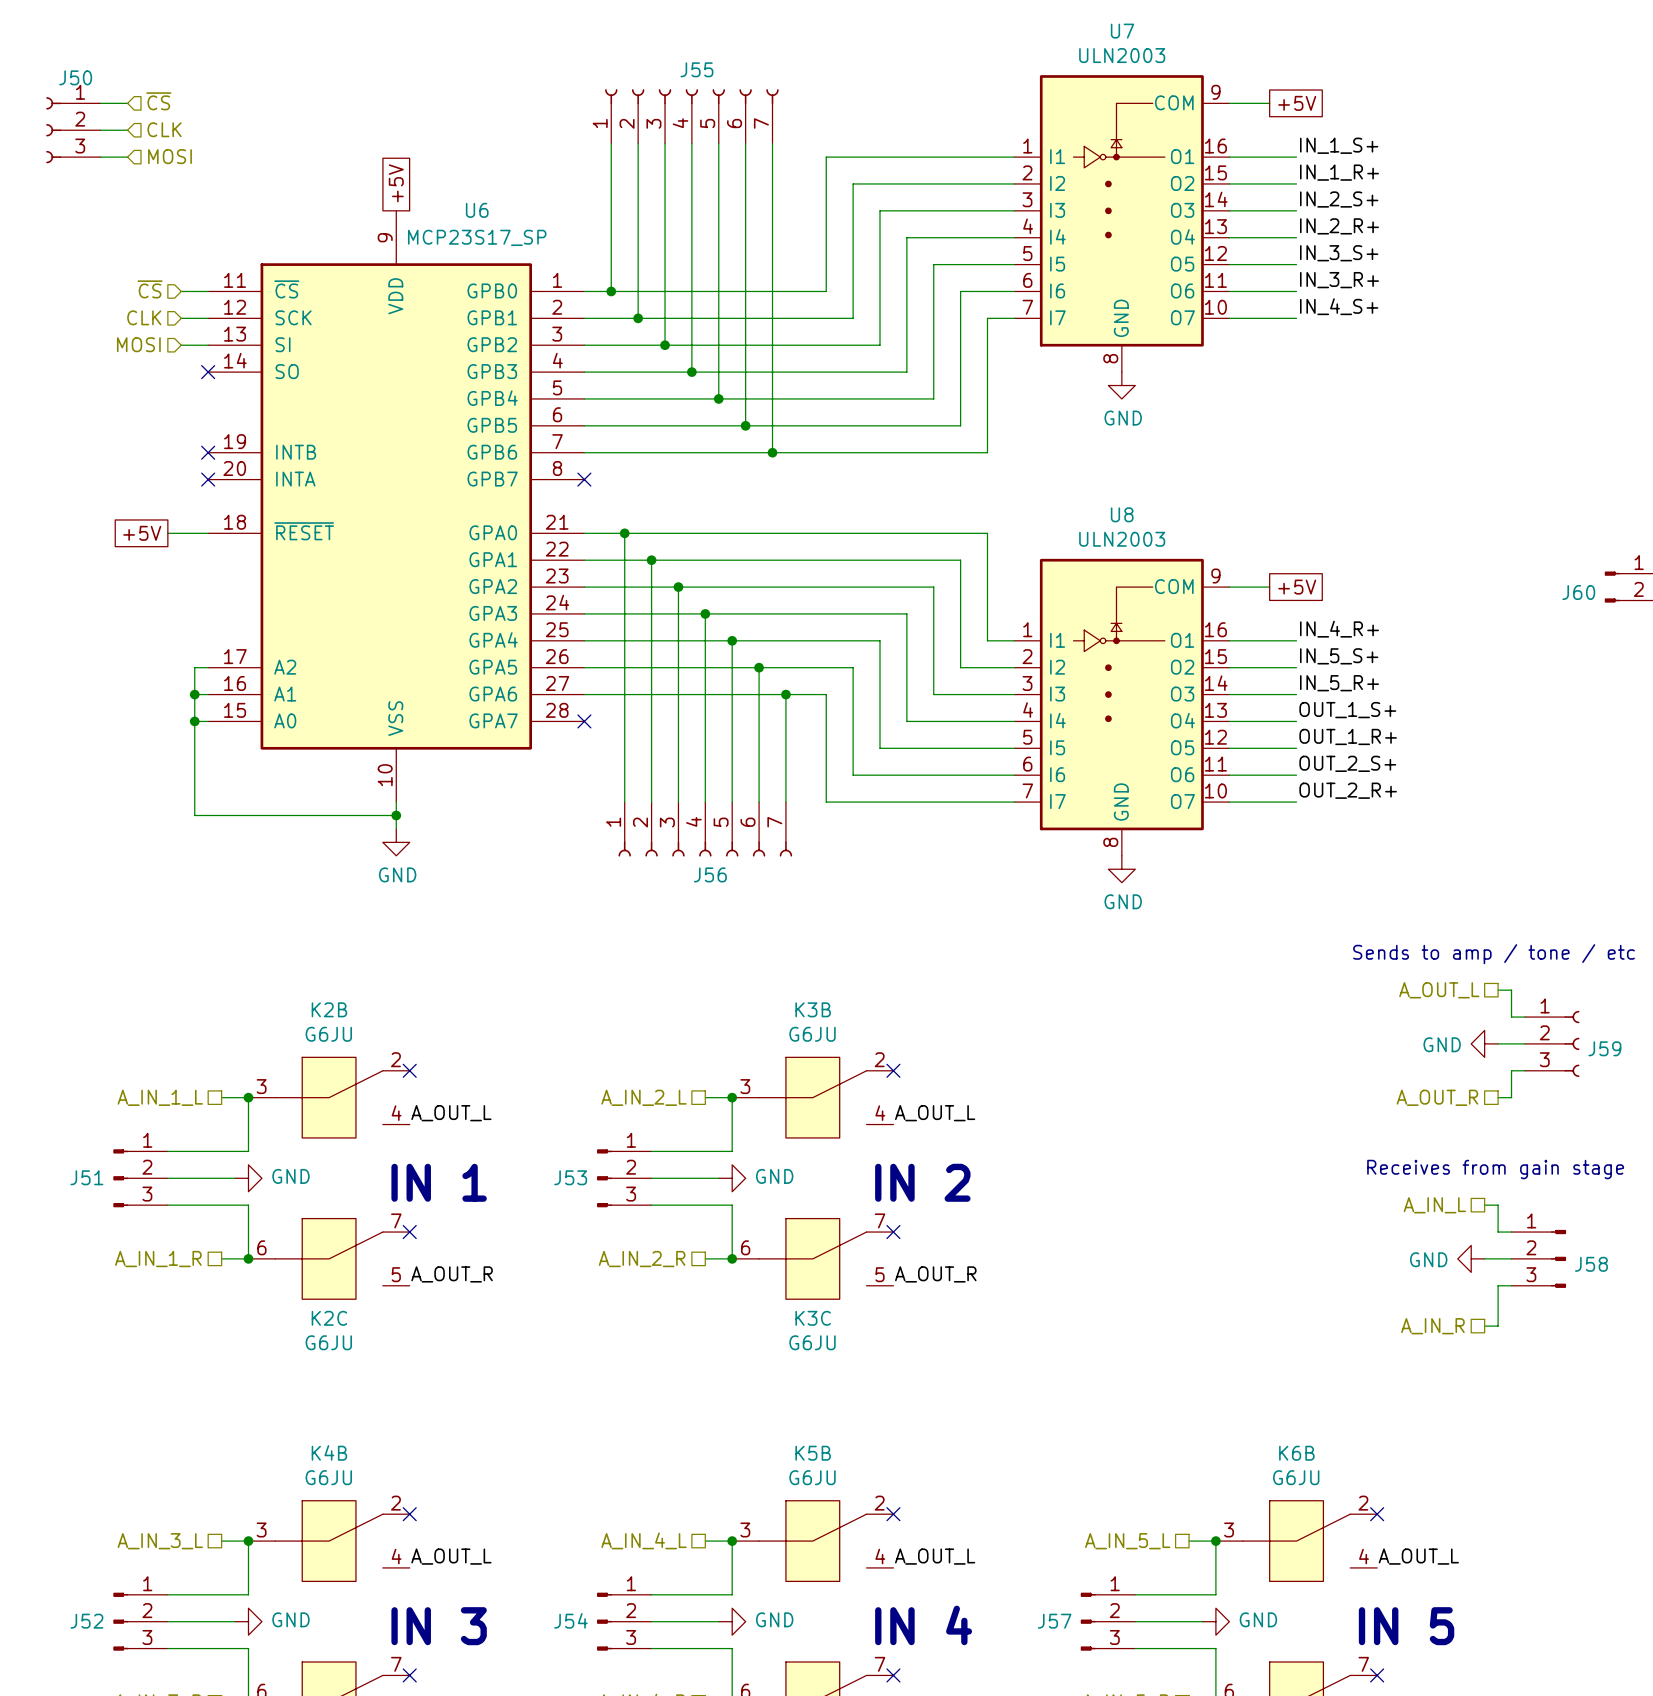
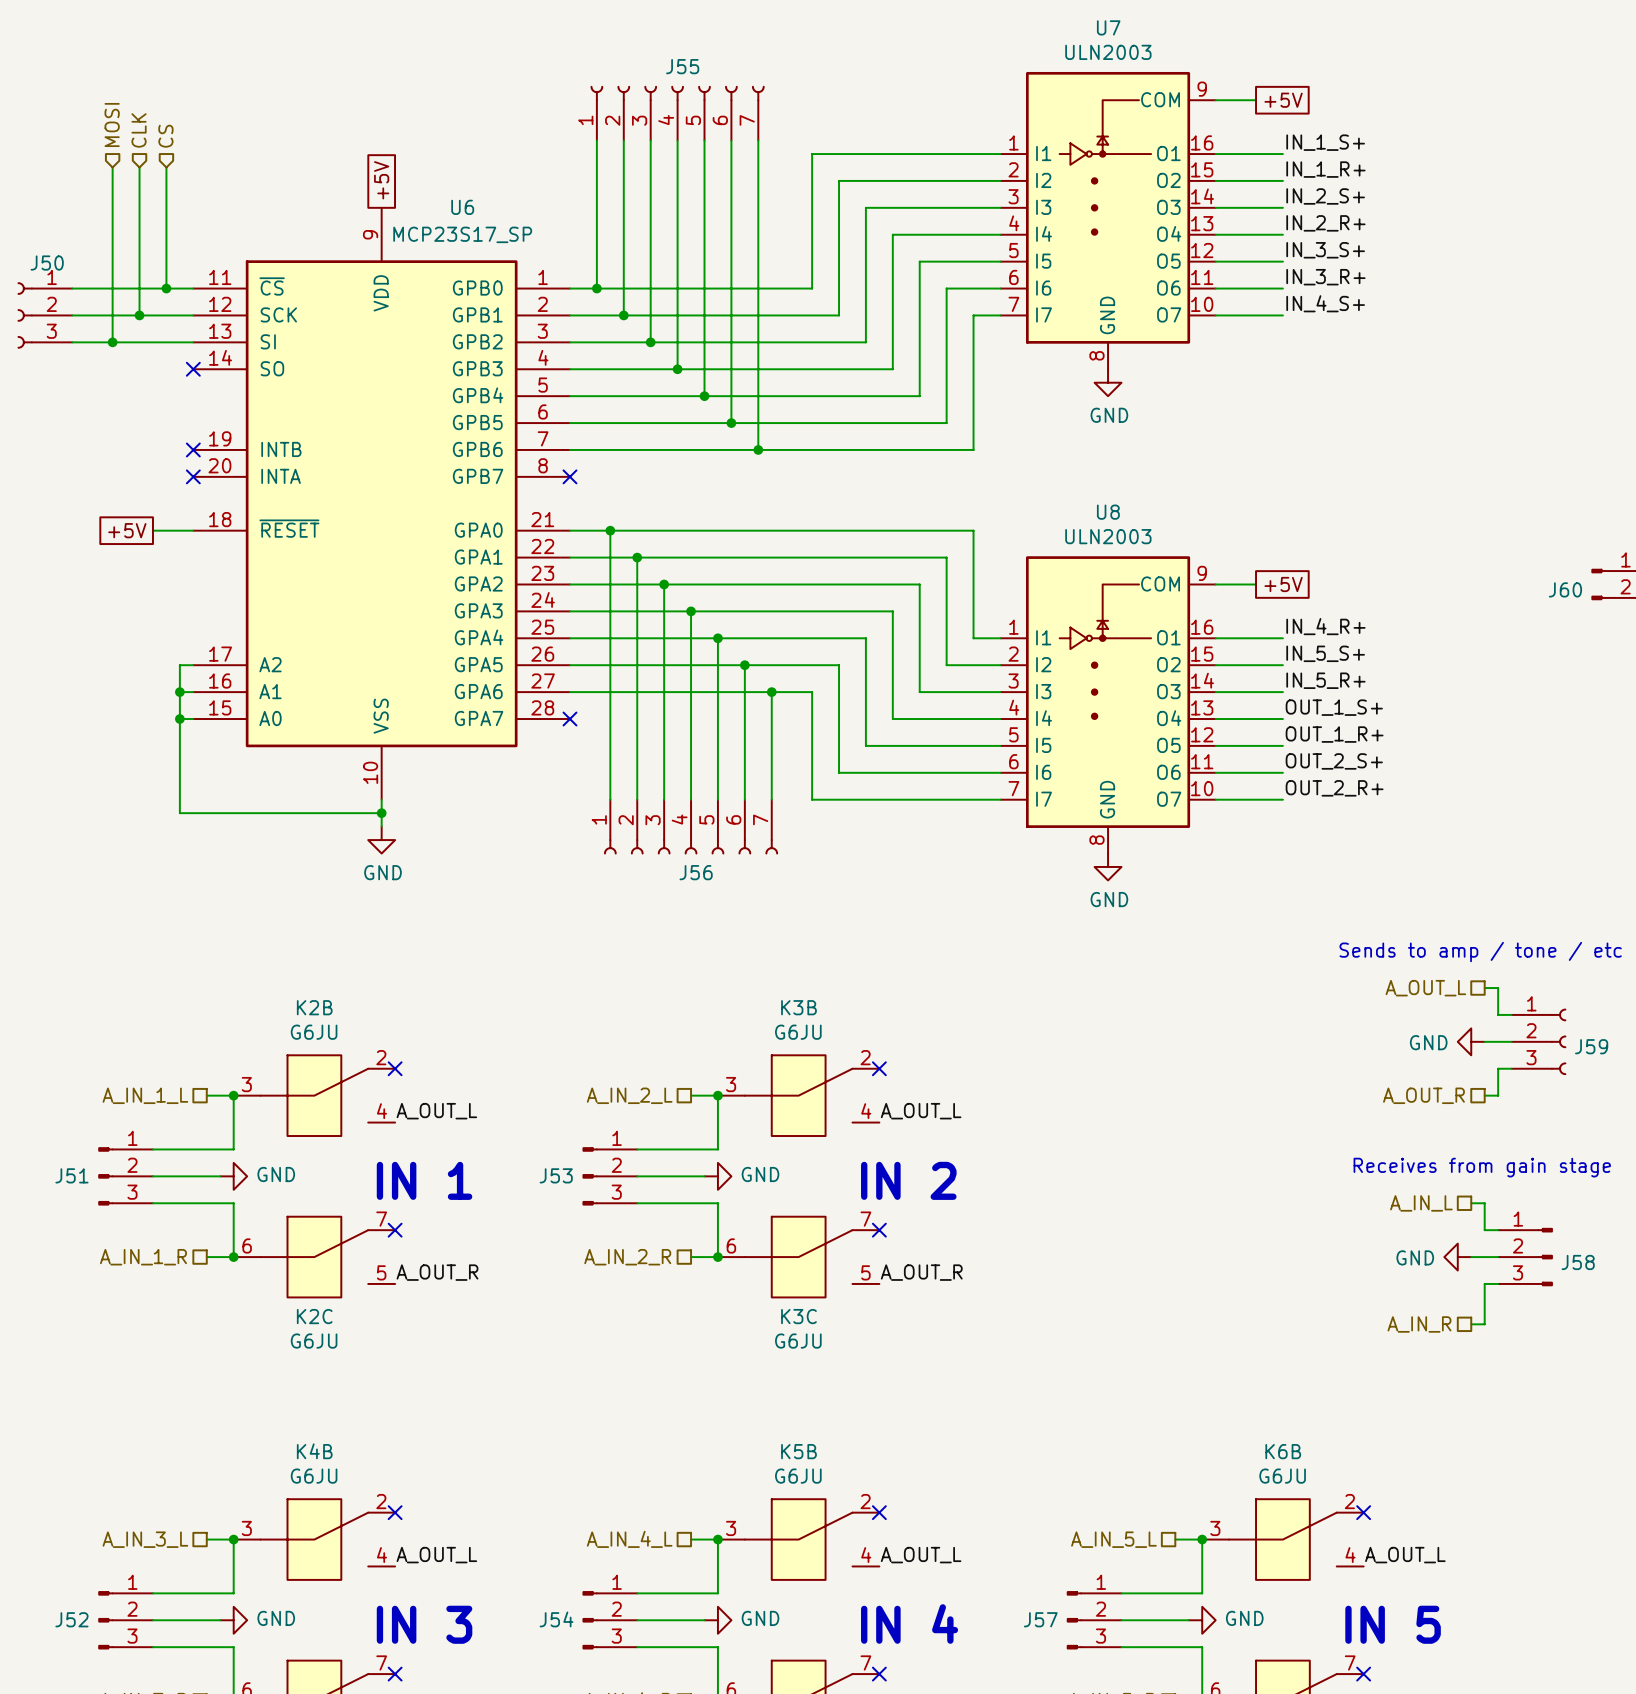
hierarchical label: ~{CS} (158, 101) -> none
wire: (100, 103) (127, 103) -> none
hierarchical label rotation: 0° (164, 129) -> 90° counterclockwise (139, 130)
J50 position: (73, 130) -> (44, 315)
wire: (100, 130) (127, 130) -> none
hierarchical label: none -> CS (165, 136)
hierarchical label rotation: 0° (169, 156) -> 90° counterclockwise (112, 124)
wire: (100, 157) (127, 157) -> none
wire: none -> (112, 167) (112, 342)
wire: none -> (139, 167) (139, 315)
wire: none -> (166, 167) (166, 288) (72, 288)
hierarchical label: ~{CS} (150, 289) -> none
junction: none -> (166, 288)
hierarchical label: CLK (144, 317) -> none
wire: none -> (72, 315) (166, 315)
junction: none -> (139, 315)
hierarchical label: MOSI (138, 344) -> none
wire: none -> (72, 342) (166, 342)
junction: none -> (112, 342)

